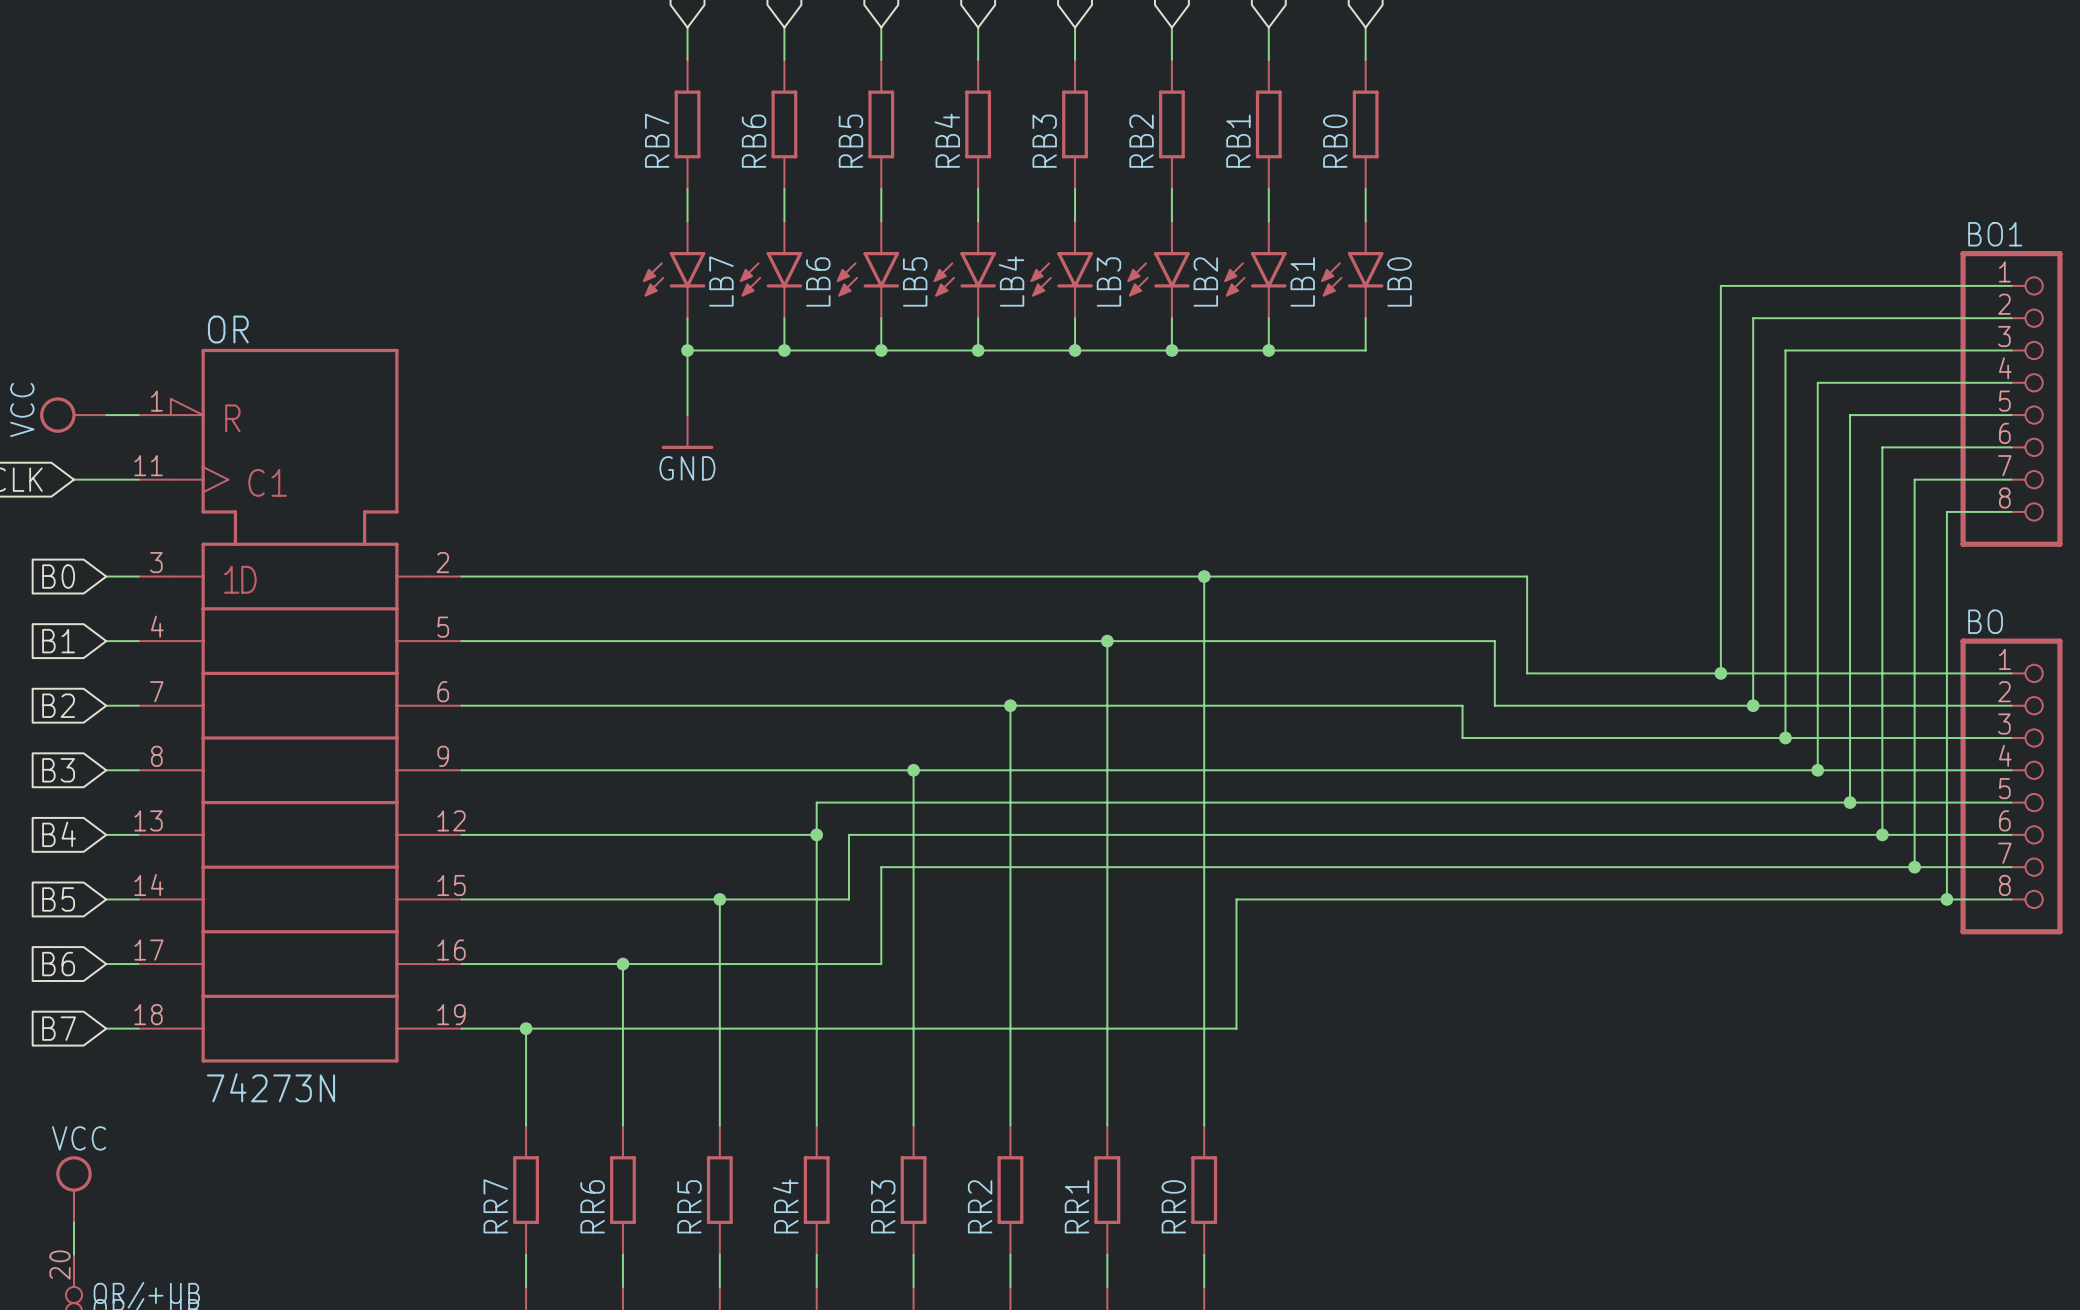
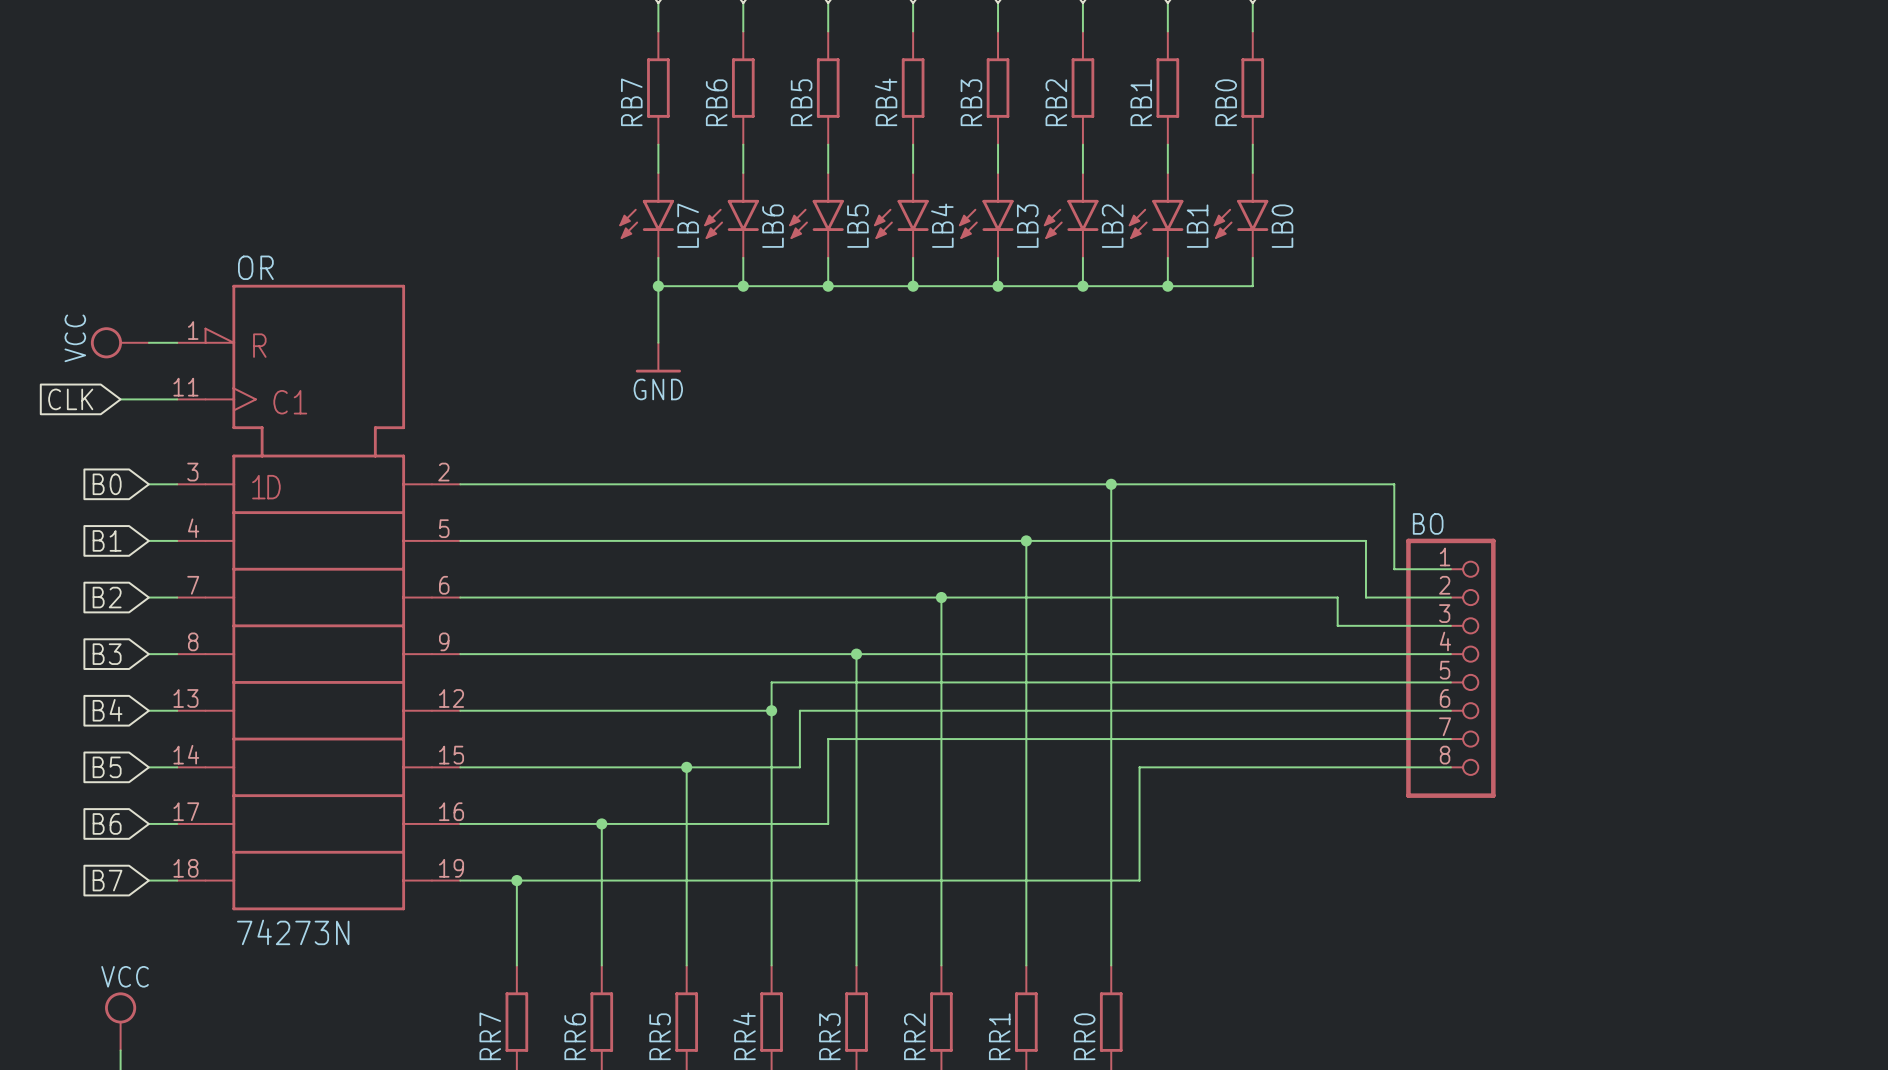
wire: (2011, 285) (1720, 285) (1720, 673) -> none
wire: (2011, 318) (1753, 318) (1753, 705) -> none
wire: (2011, 350) (1785, 350) (1785, 738) -> none
wire: (2011, 382) (1817, 382) (1817, 770) -> none
BO1: (2011, 398) -> none
wire: (2011, 415) (1850, 415) (1850, 802) -> none
wire: (2011, 447) (1882, 447) (1882, 834) -> none
wire: (2011, 479) (1914, 479) (1914, 867) -> none
wire: (2011, 511) (1946, 511) (1946, 899) -> none
wire: (1591, 673) (2011, 673) -> none
junction: (1720, 673) -> none
wire: (1591, 705) (2011, 705) -> none
junction: (1753, 705) -> none
wire: (1591, 738) (2011, 738) -> none
junction: (1785, 738) -> none
wire: (1591, 770) (2011, 770) -> none
junction: (1817, 770) -> none
BO: none -> (1450, 668)
BO: (2011, 786) -> none
wire: (1591, 802) (2011, 802) -> none
junction: (1850, 802) -> none
wire: (1591, 834) (2011, 834) -> none
junction: (1882, 834) -> none
wire: (1591, 867) (2011, 867) -> none
junction: (1914, 867) -> none
wire: (1591, 899) (2011, 899) -> none
junction: (1946, 899) -> none

